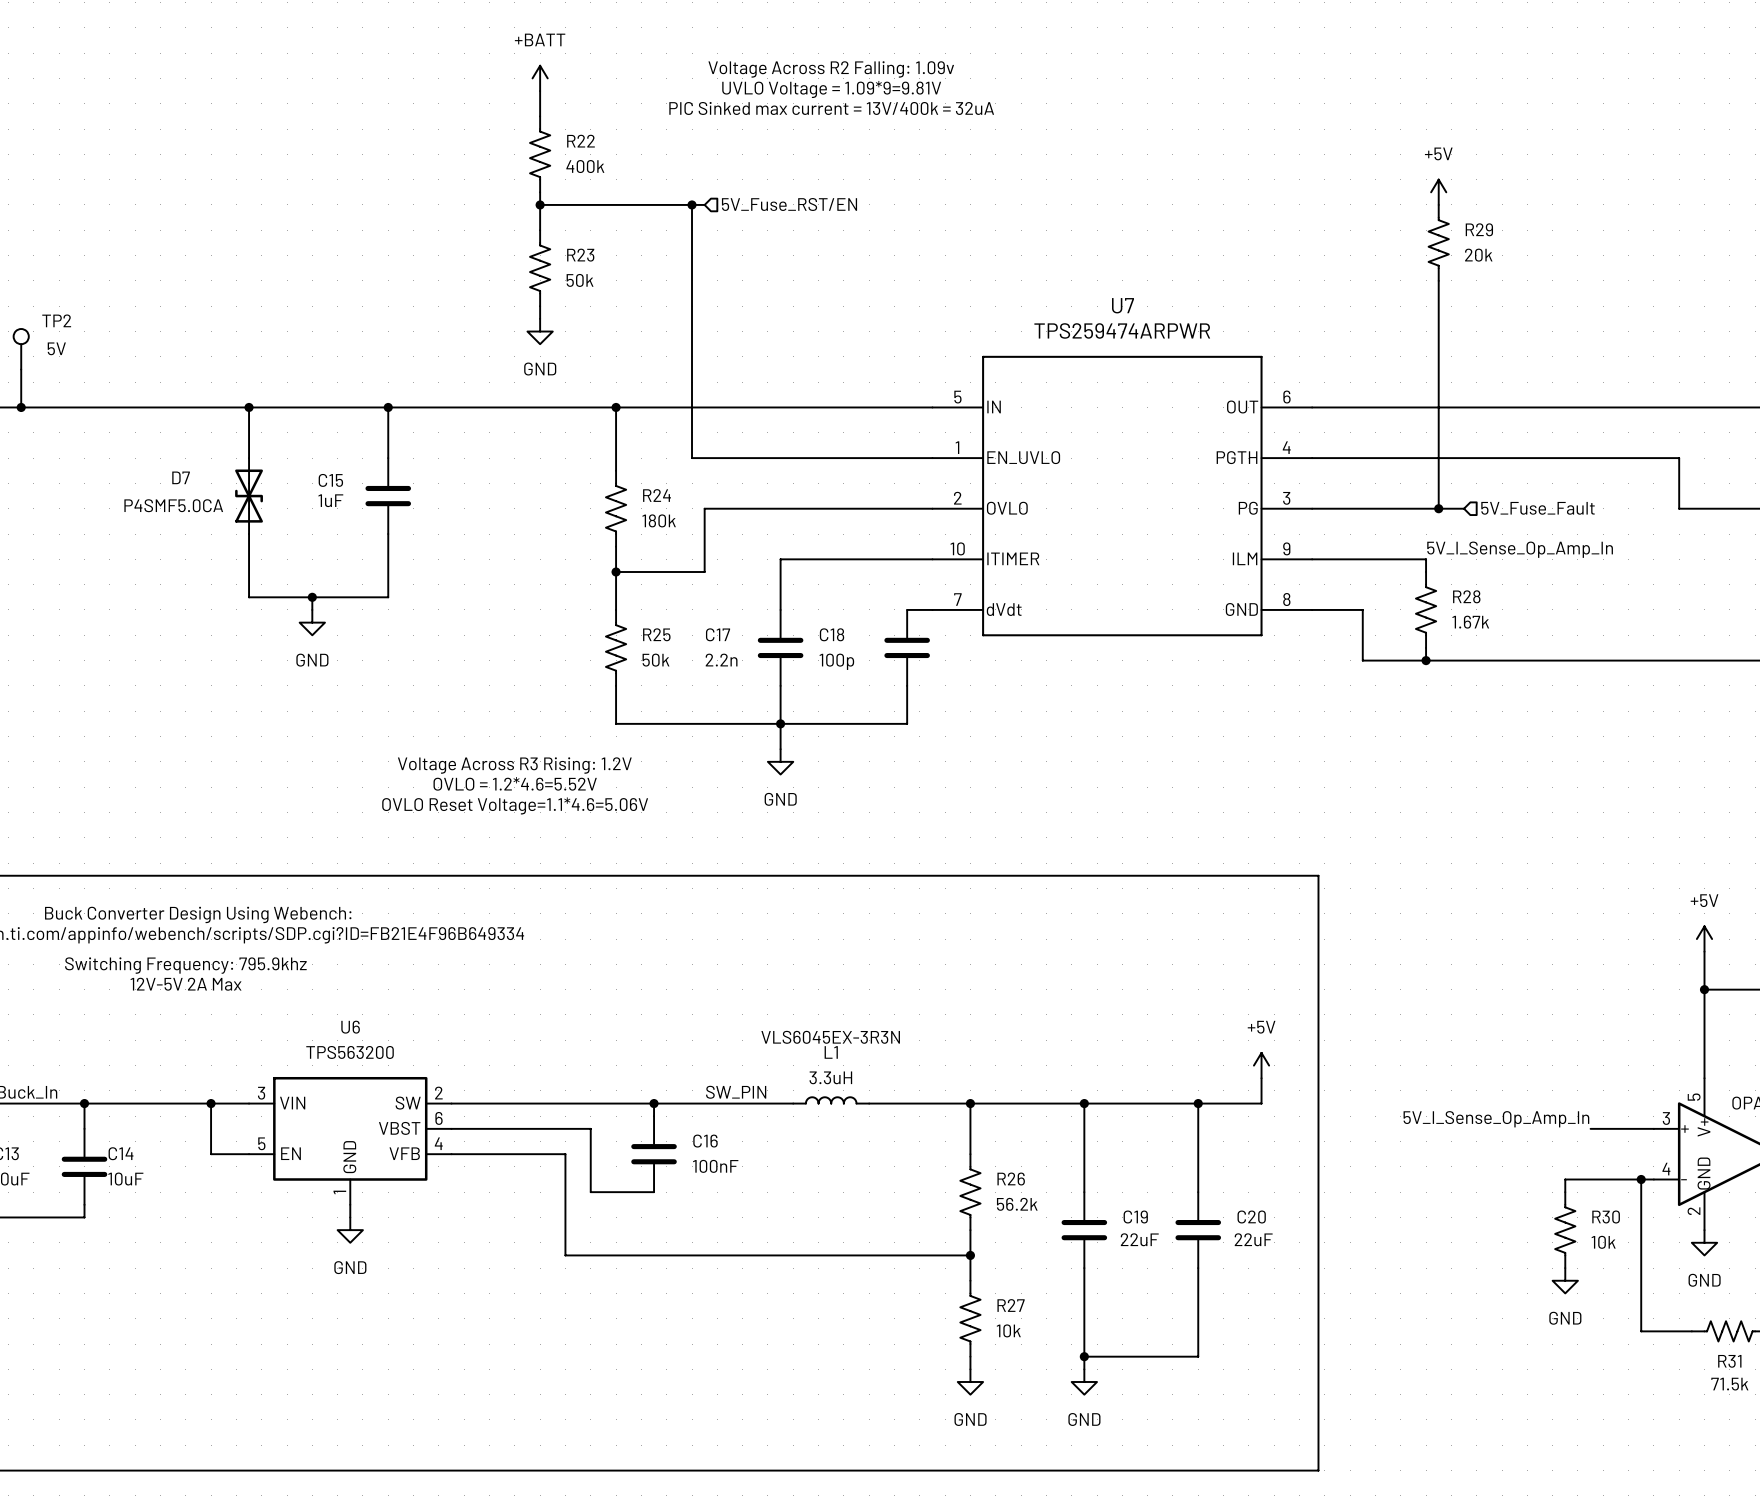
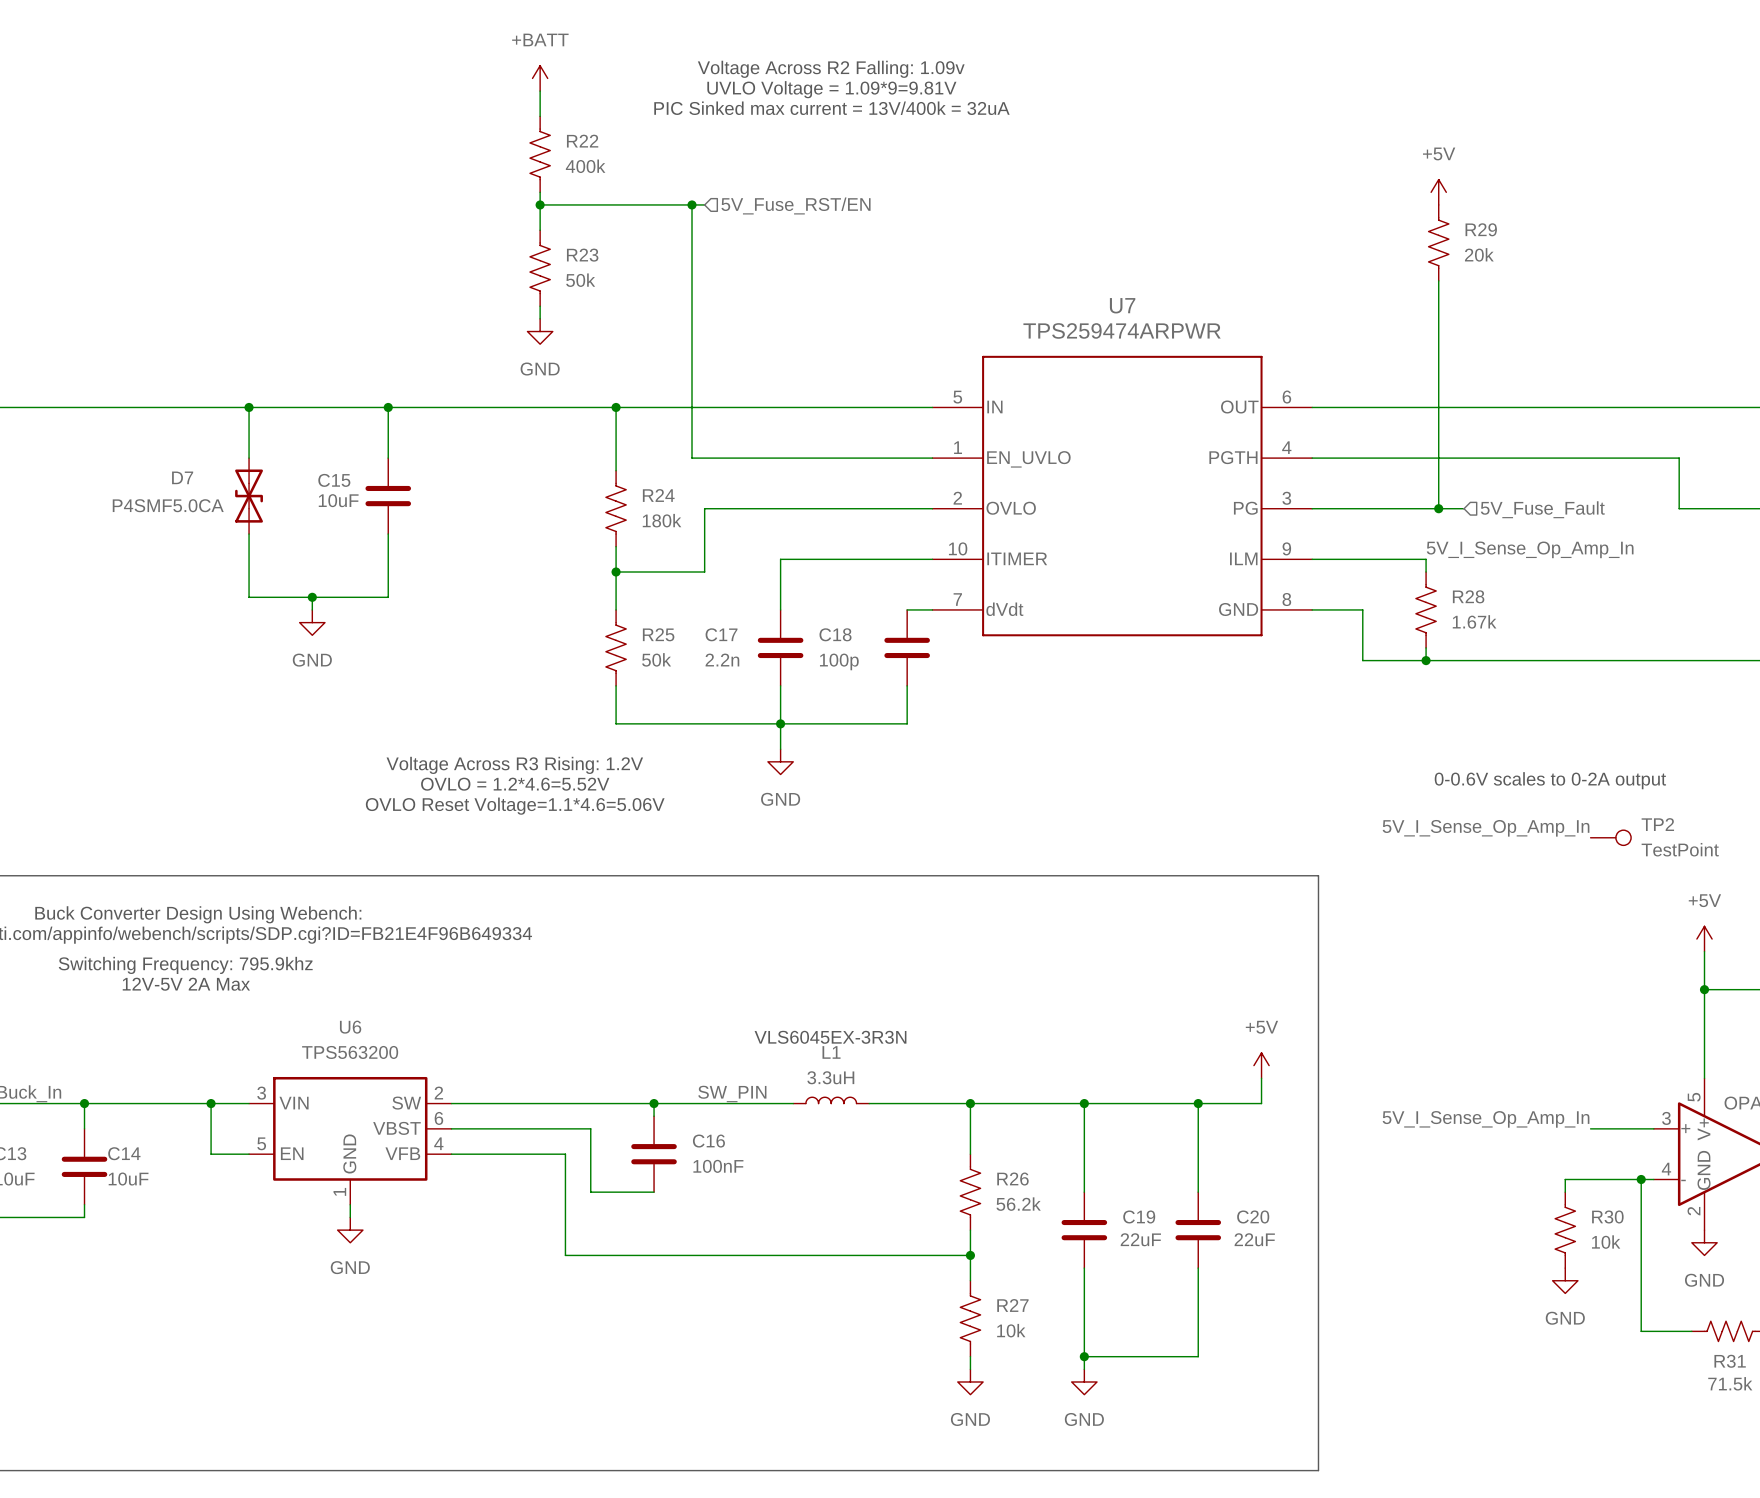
TP2 rotation: 0° (21, 336) -> 90° clockwise (1623, 837)
TP2 value: 5V (56, 348) -> TestPoint (1680, 849)
TP2 position: (21, 349) -> (1610, 837)
wire: (21, 369) (21, 407) -> none
junction: (21, 407) -> none
C15 value: 1uF (330, 500) -> 10uF (338, 500)
text: none -> 0-0.6V scales to 0-2A output (1550, 780)
label: none -> 5V_I_Sense_Op_Amp_In (1486, 828)

